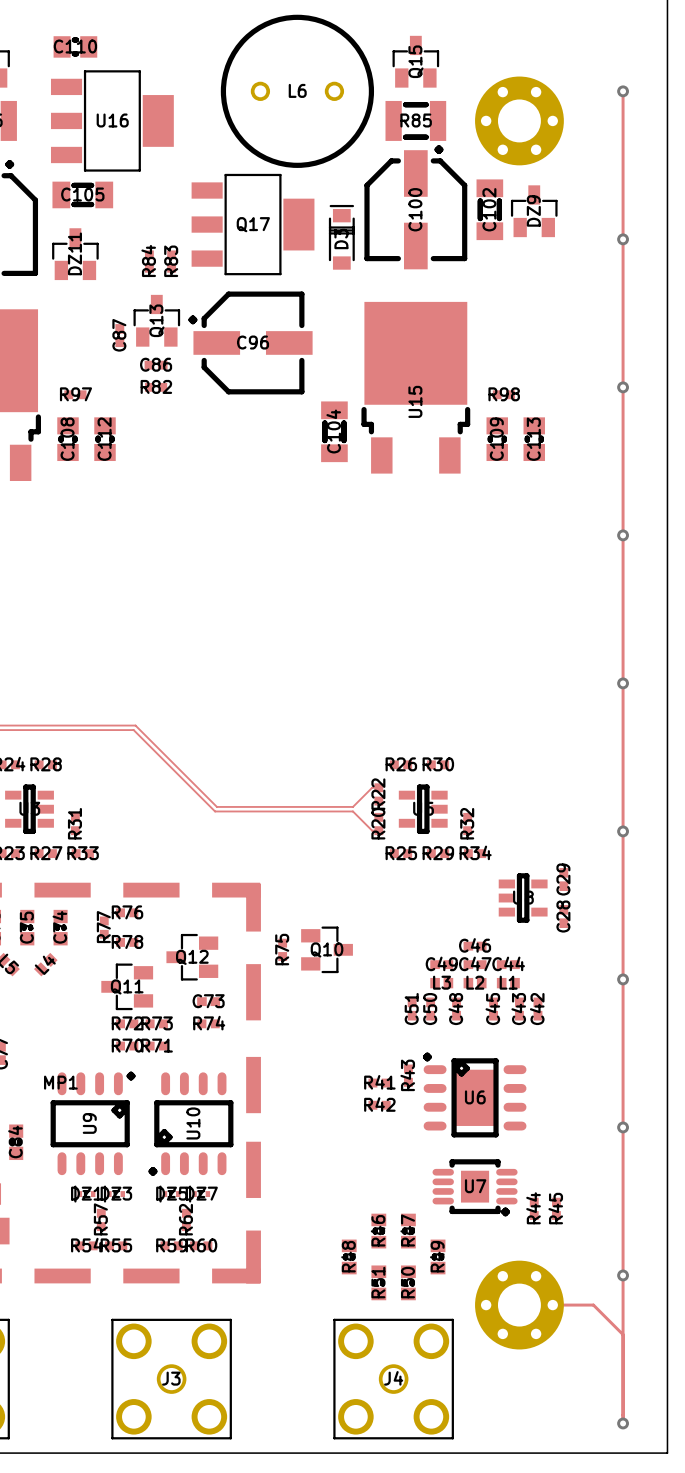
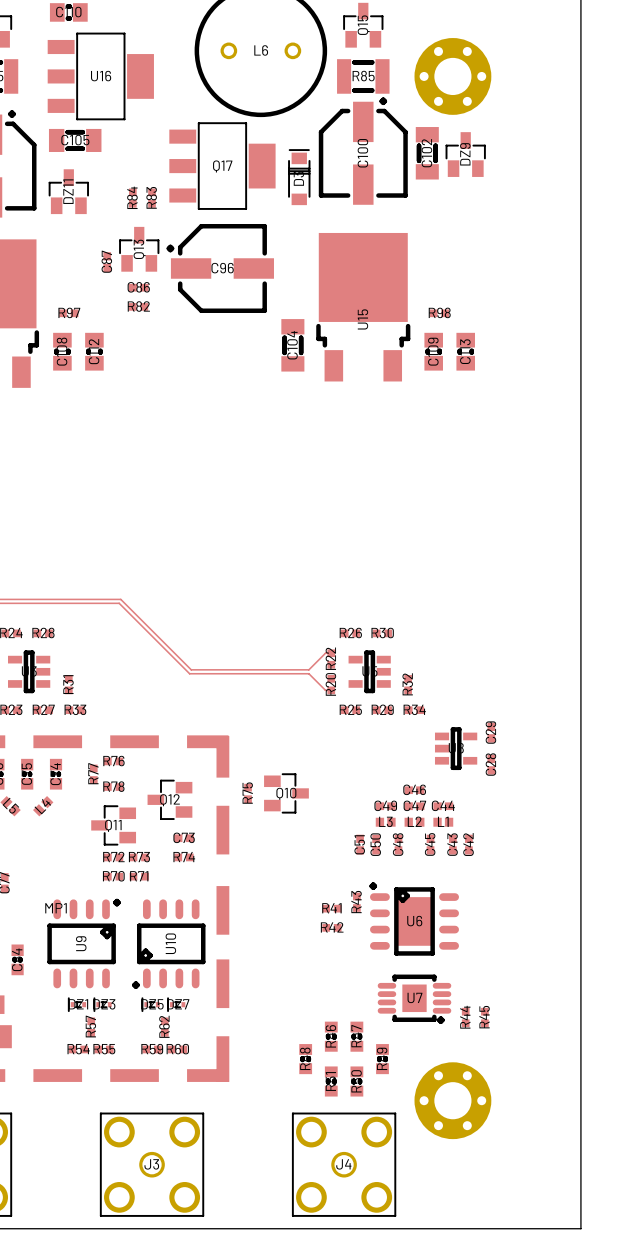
track: (623, 91) (623, 1423) -> none
via: (623, 91) -> none
via: (623, 239) -> none
via: (623, 387) -> none
via: (623, 535) -> none
via: (623, 683) -> none
via: (623, 831) -> none
via: (623, 979) -> none
via: (623, 1127) -> none
via: (623, 1275) -> none
track: (552, 1305) (593, 1305) (623, 1334) -> none
via: (623, 1423) -> none

